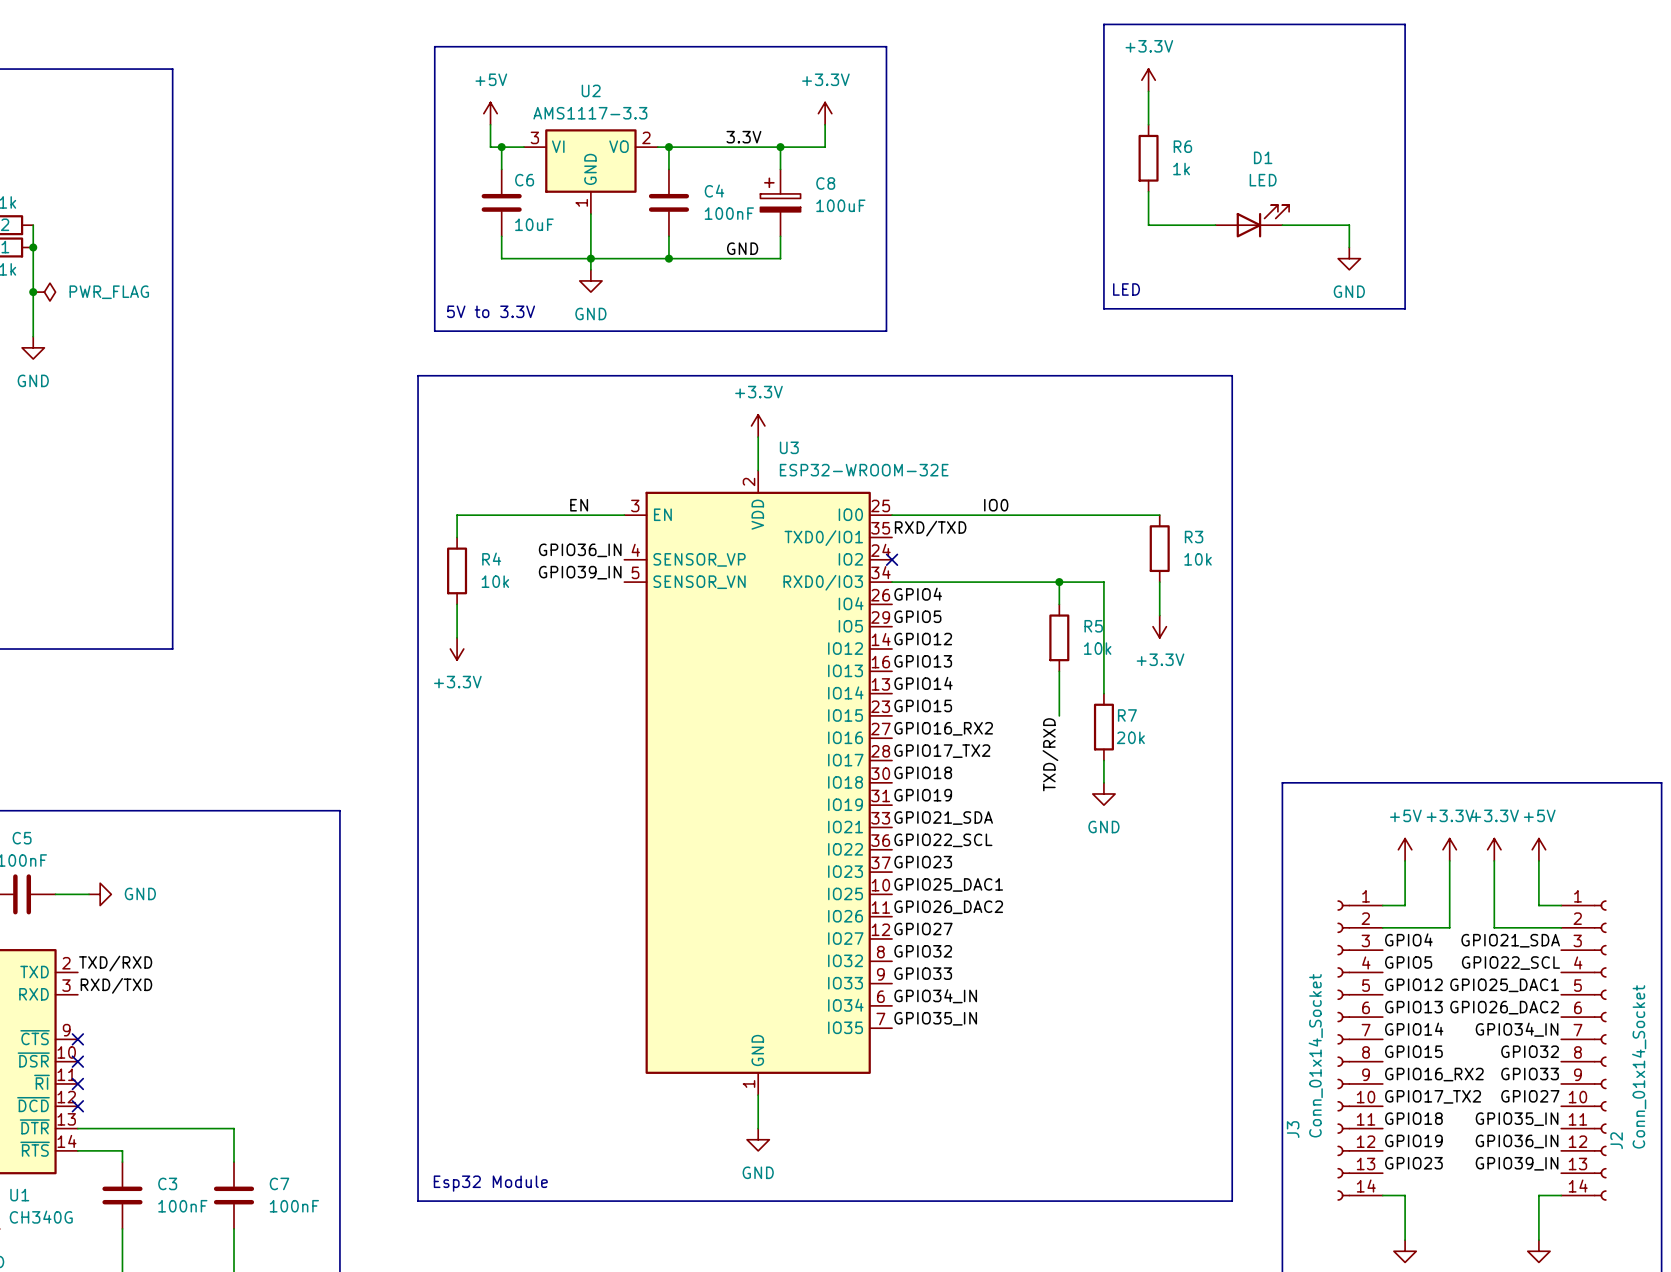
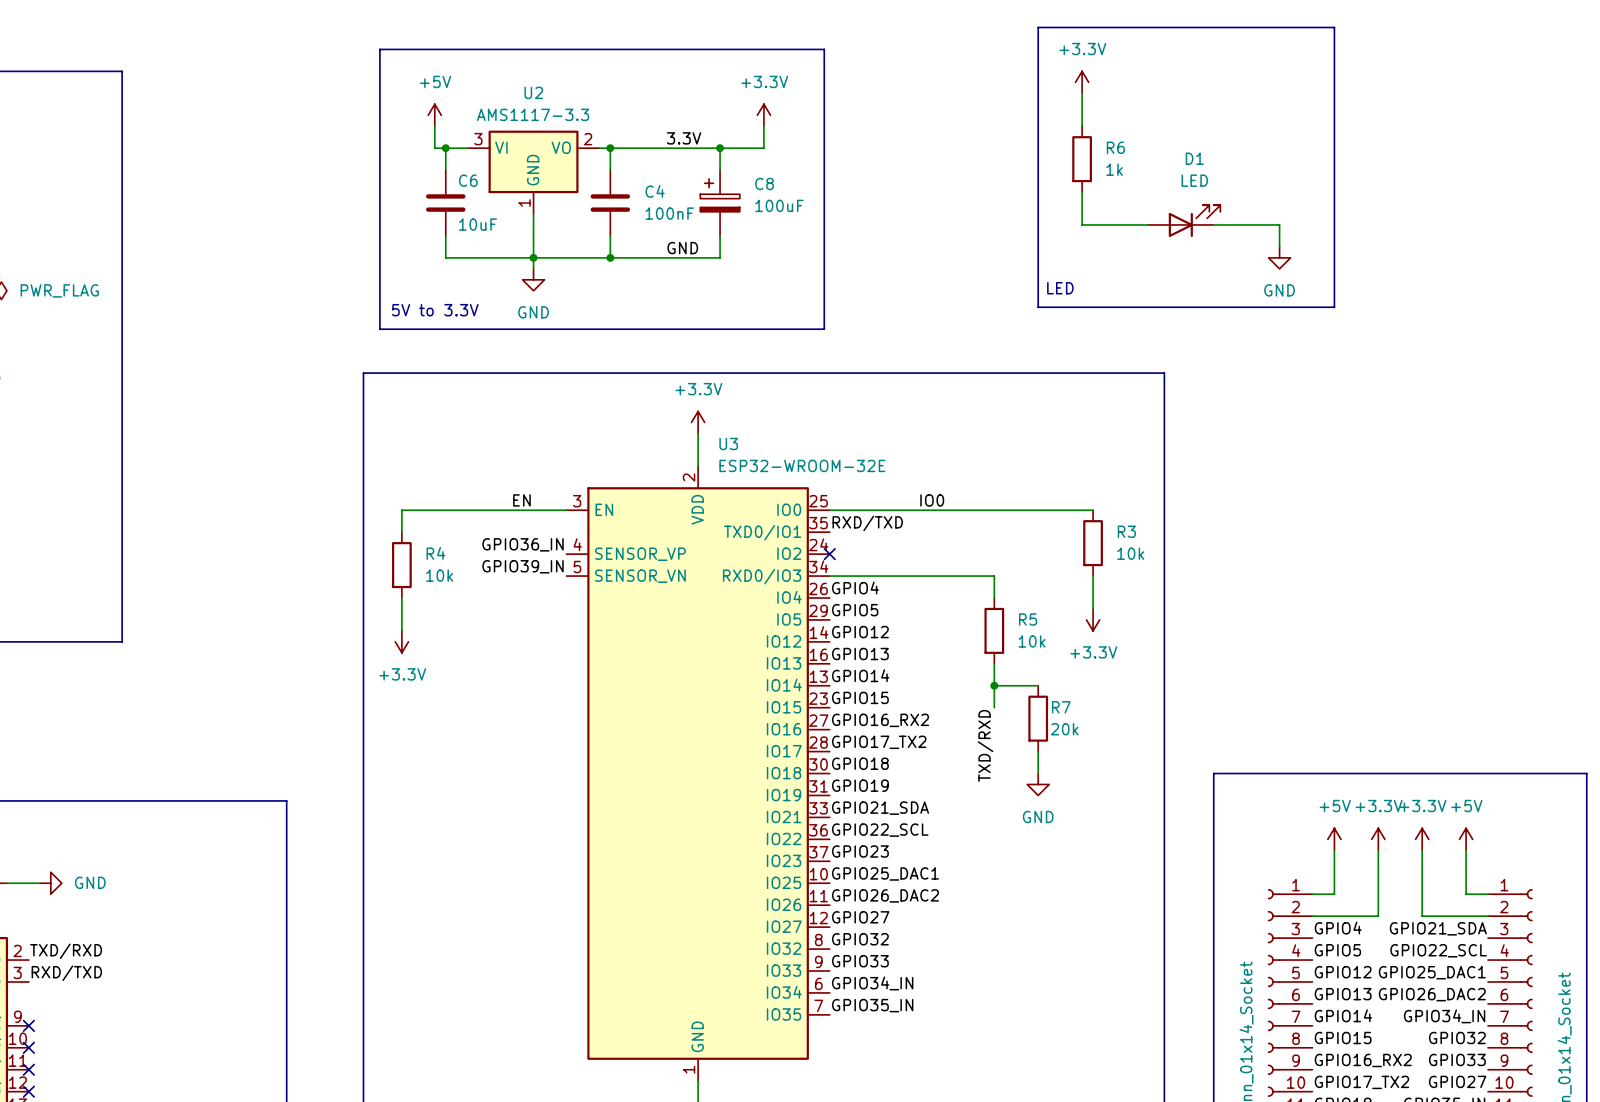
wire: (1059, 582) (1103, 582) (1103, 693) -> (994, 685) (1038, 685)
junction: (1059, 582) -> none
junction: none -> (994, 685)

